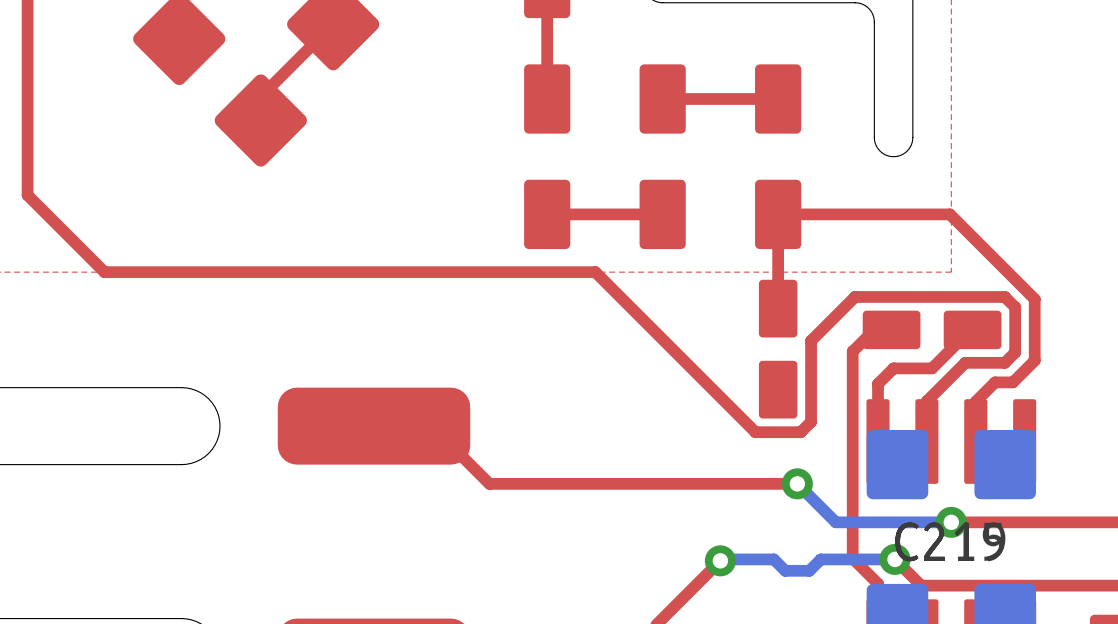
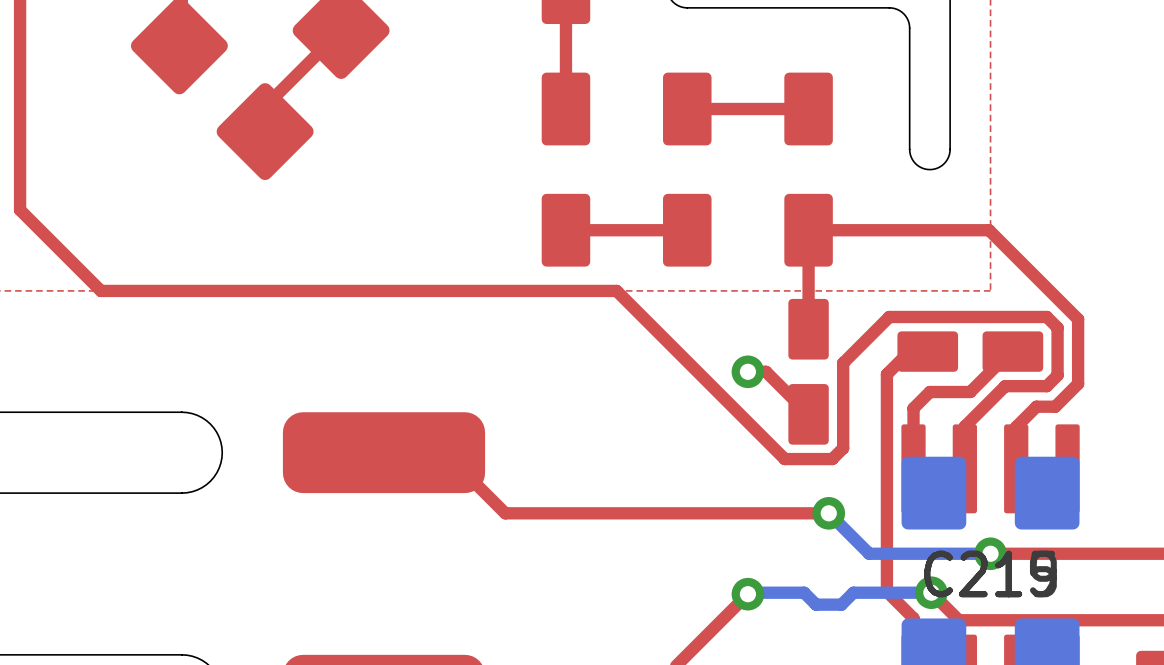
top track: none -> (747, 371) (766, 371) (808, 414)
via: none -> (747, 371)

